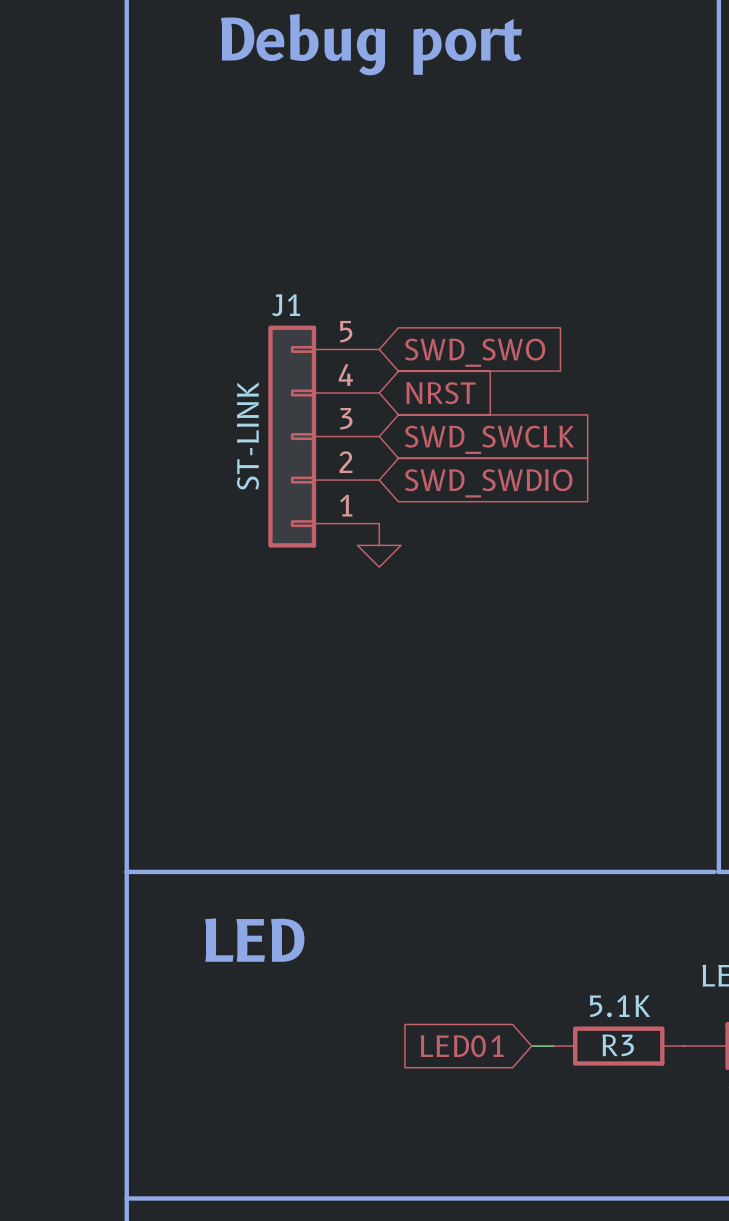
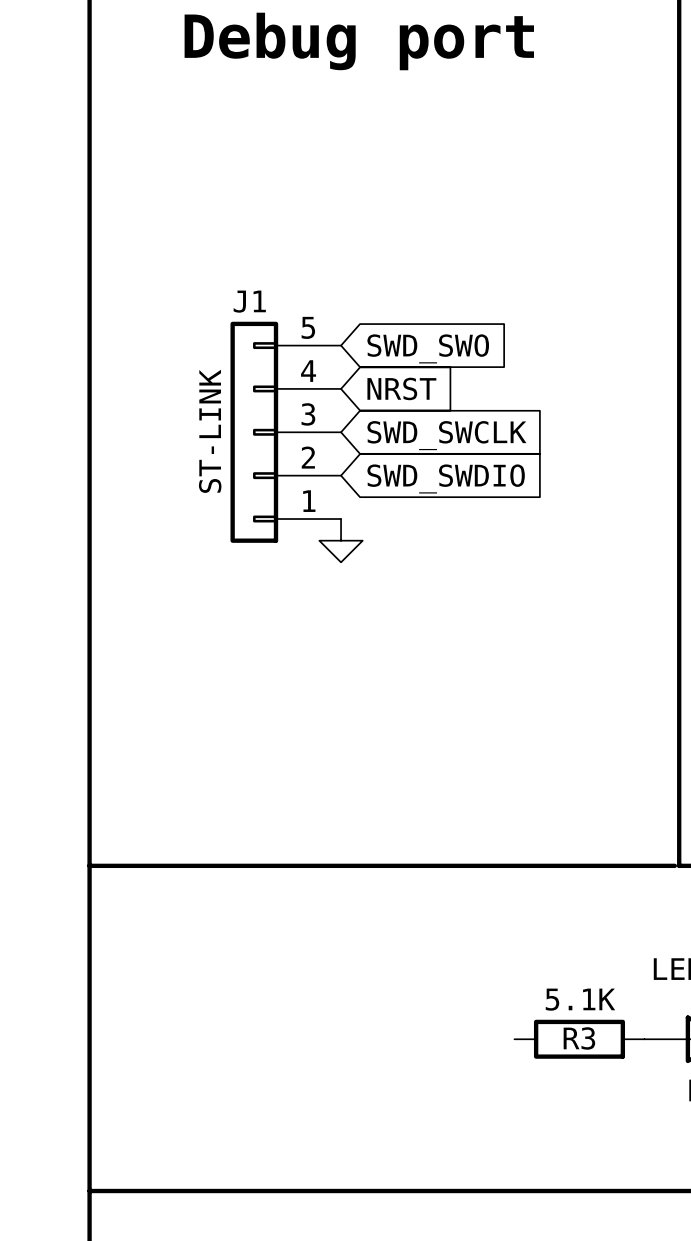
text: LED (254, 940) -> none
global label: LED01 (462, 1046) -> none
wire: (531, 1046) (553, 1046) -> none

